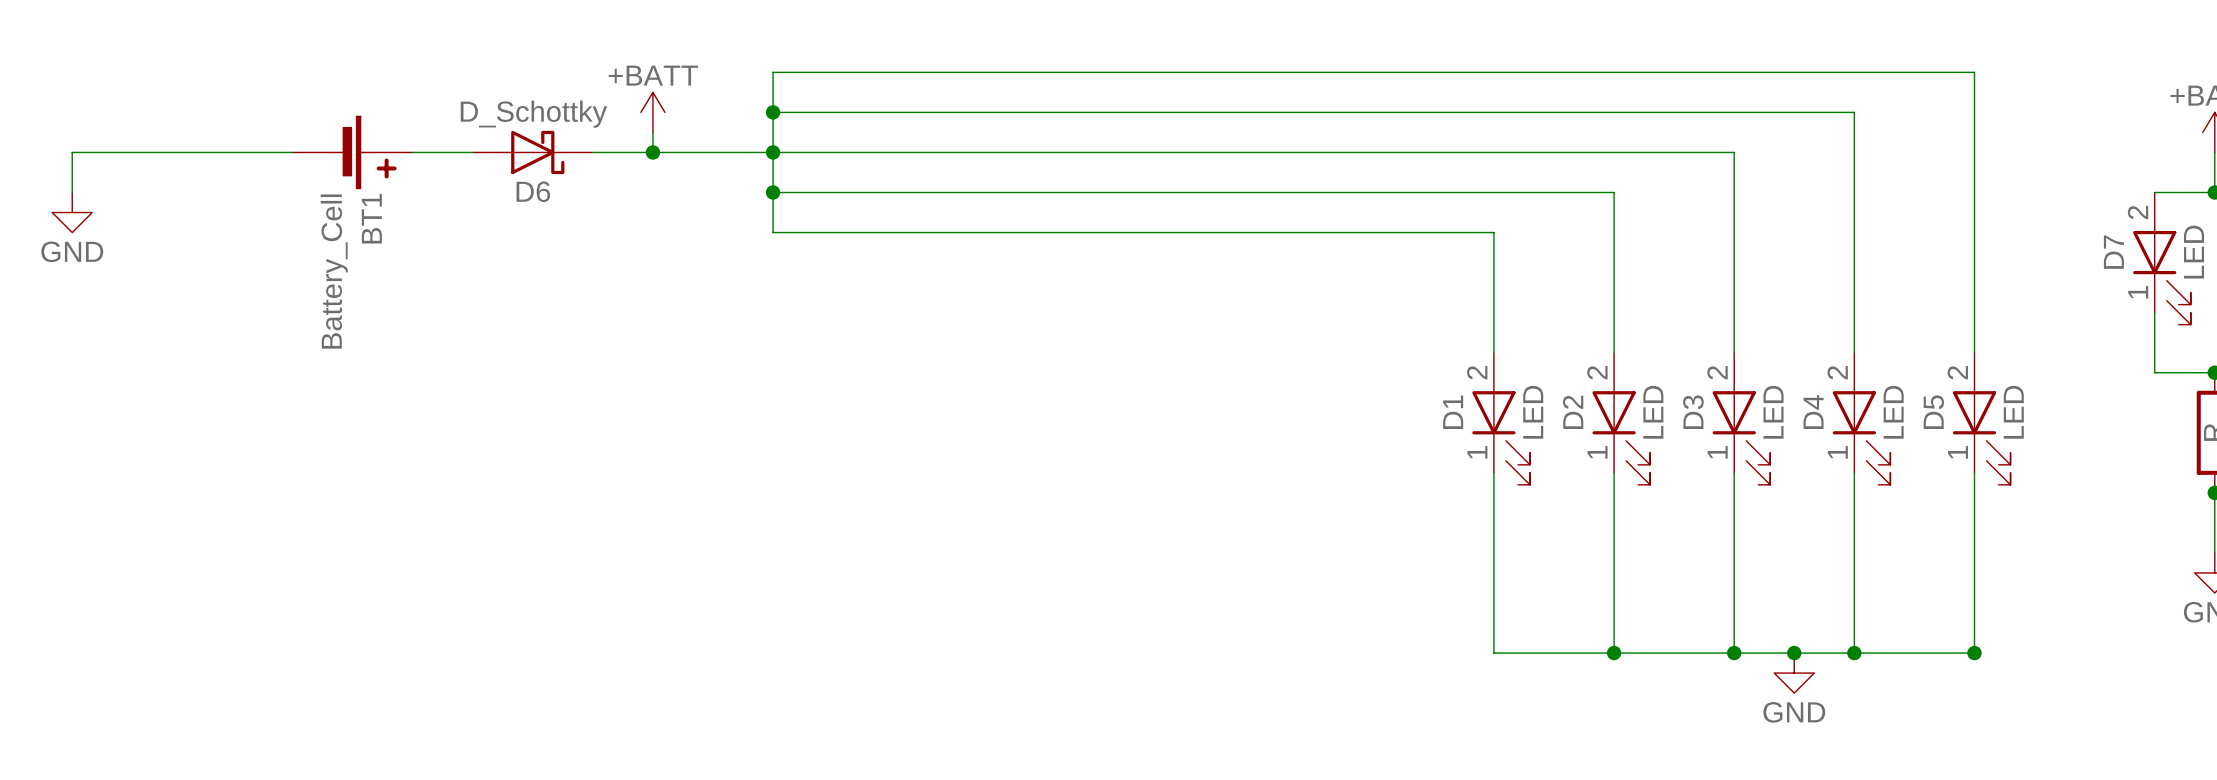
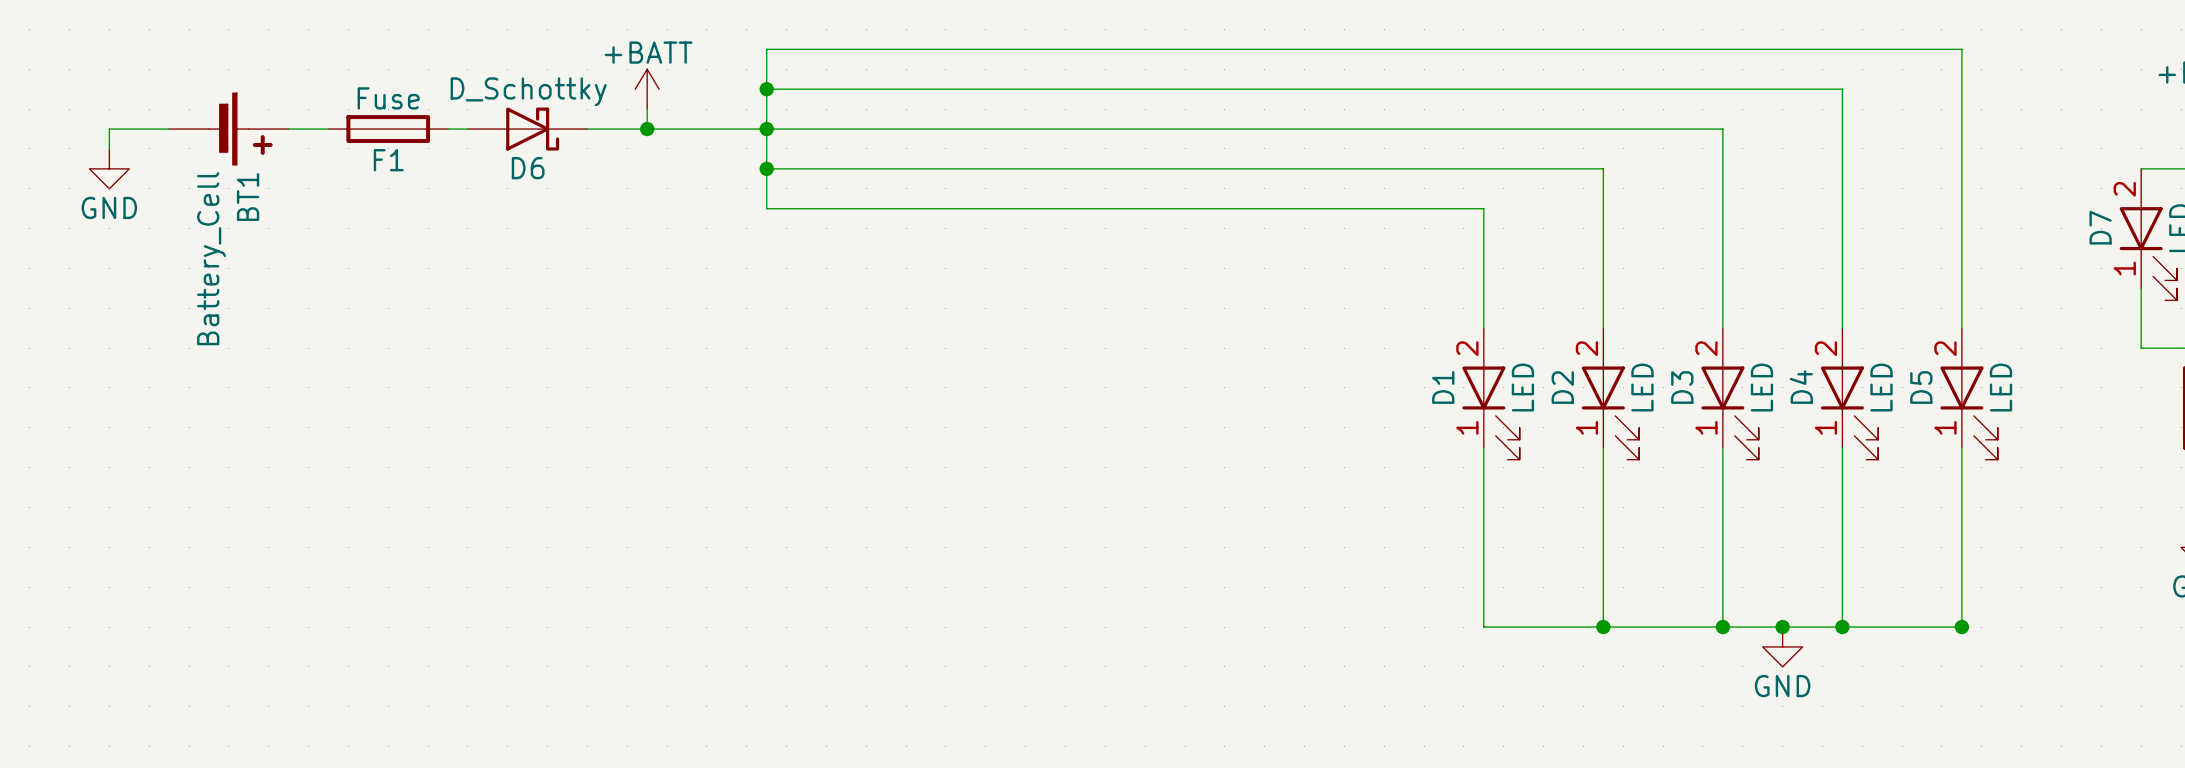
wire: (112, 152) (72, 152) (72, 192) -> (109, 129) (109, 148)
BT1 position: (352, 152) -> (228, 129)
F1: none -> Fuse (388, 129)
power symbol position: GND (72, 212) -> GND (109, 168)

